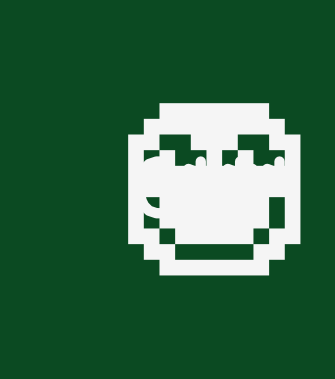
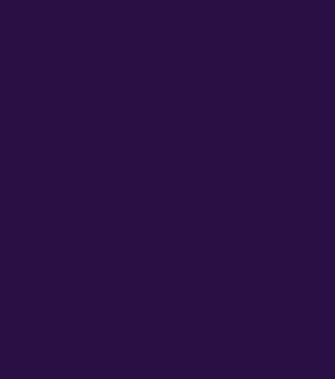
part: (214, 189) -> none

